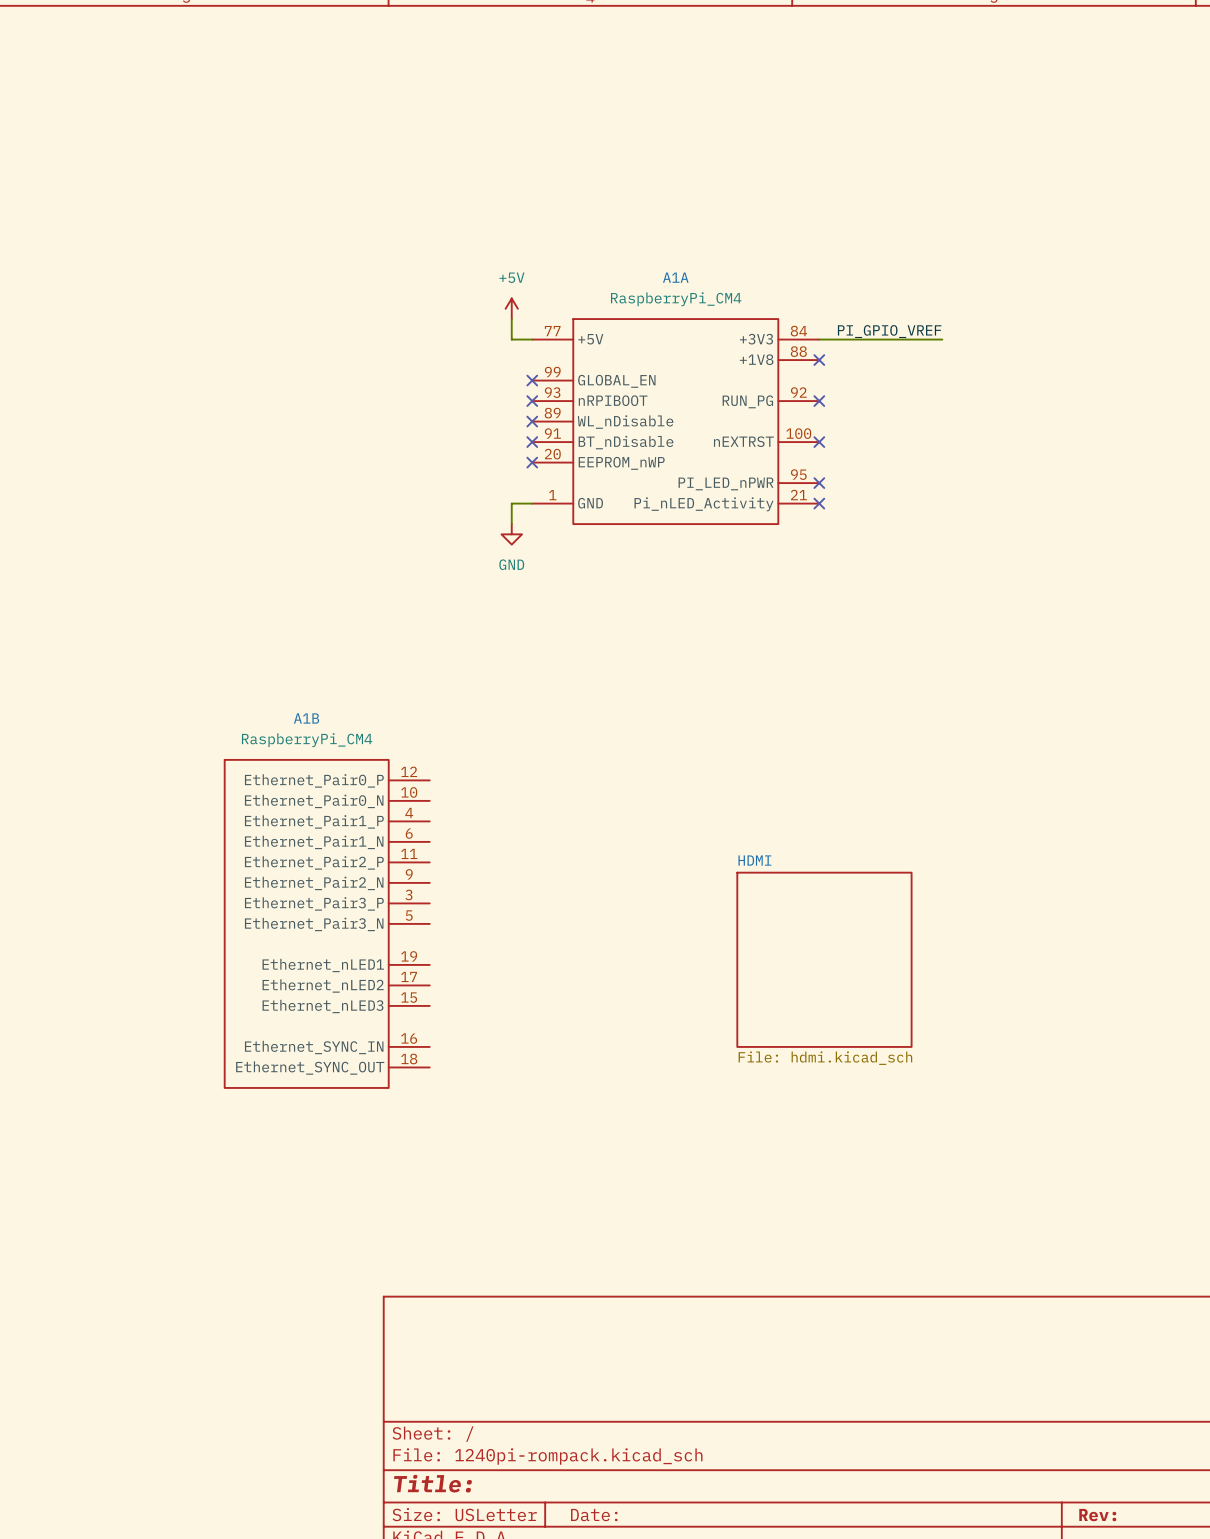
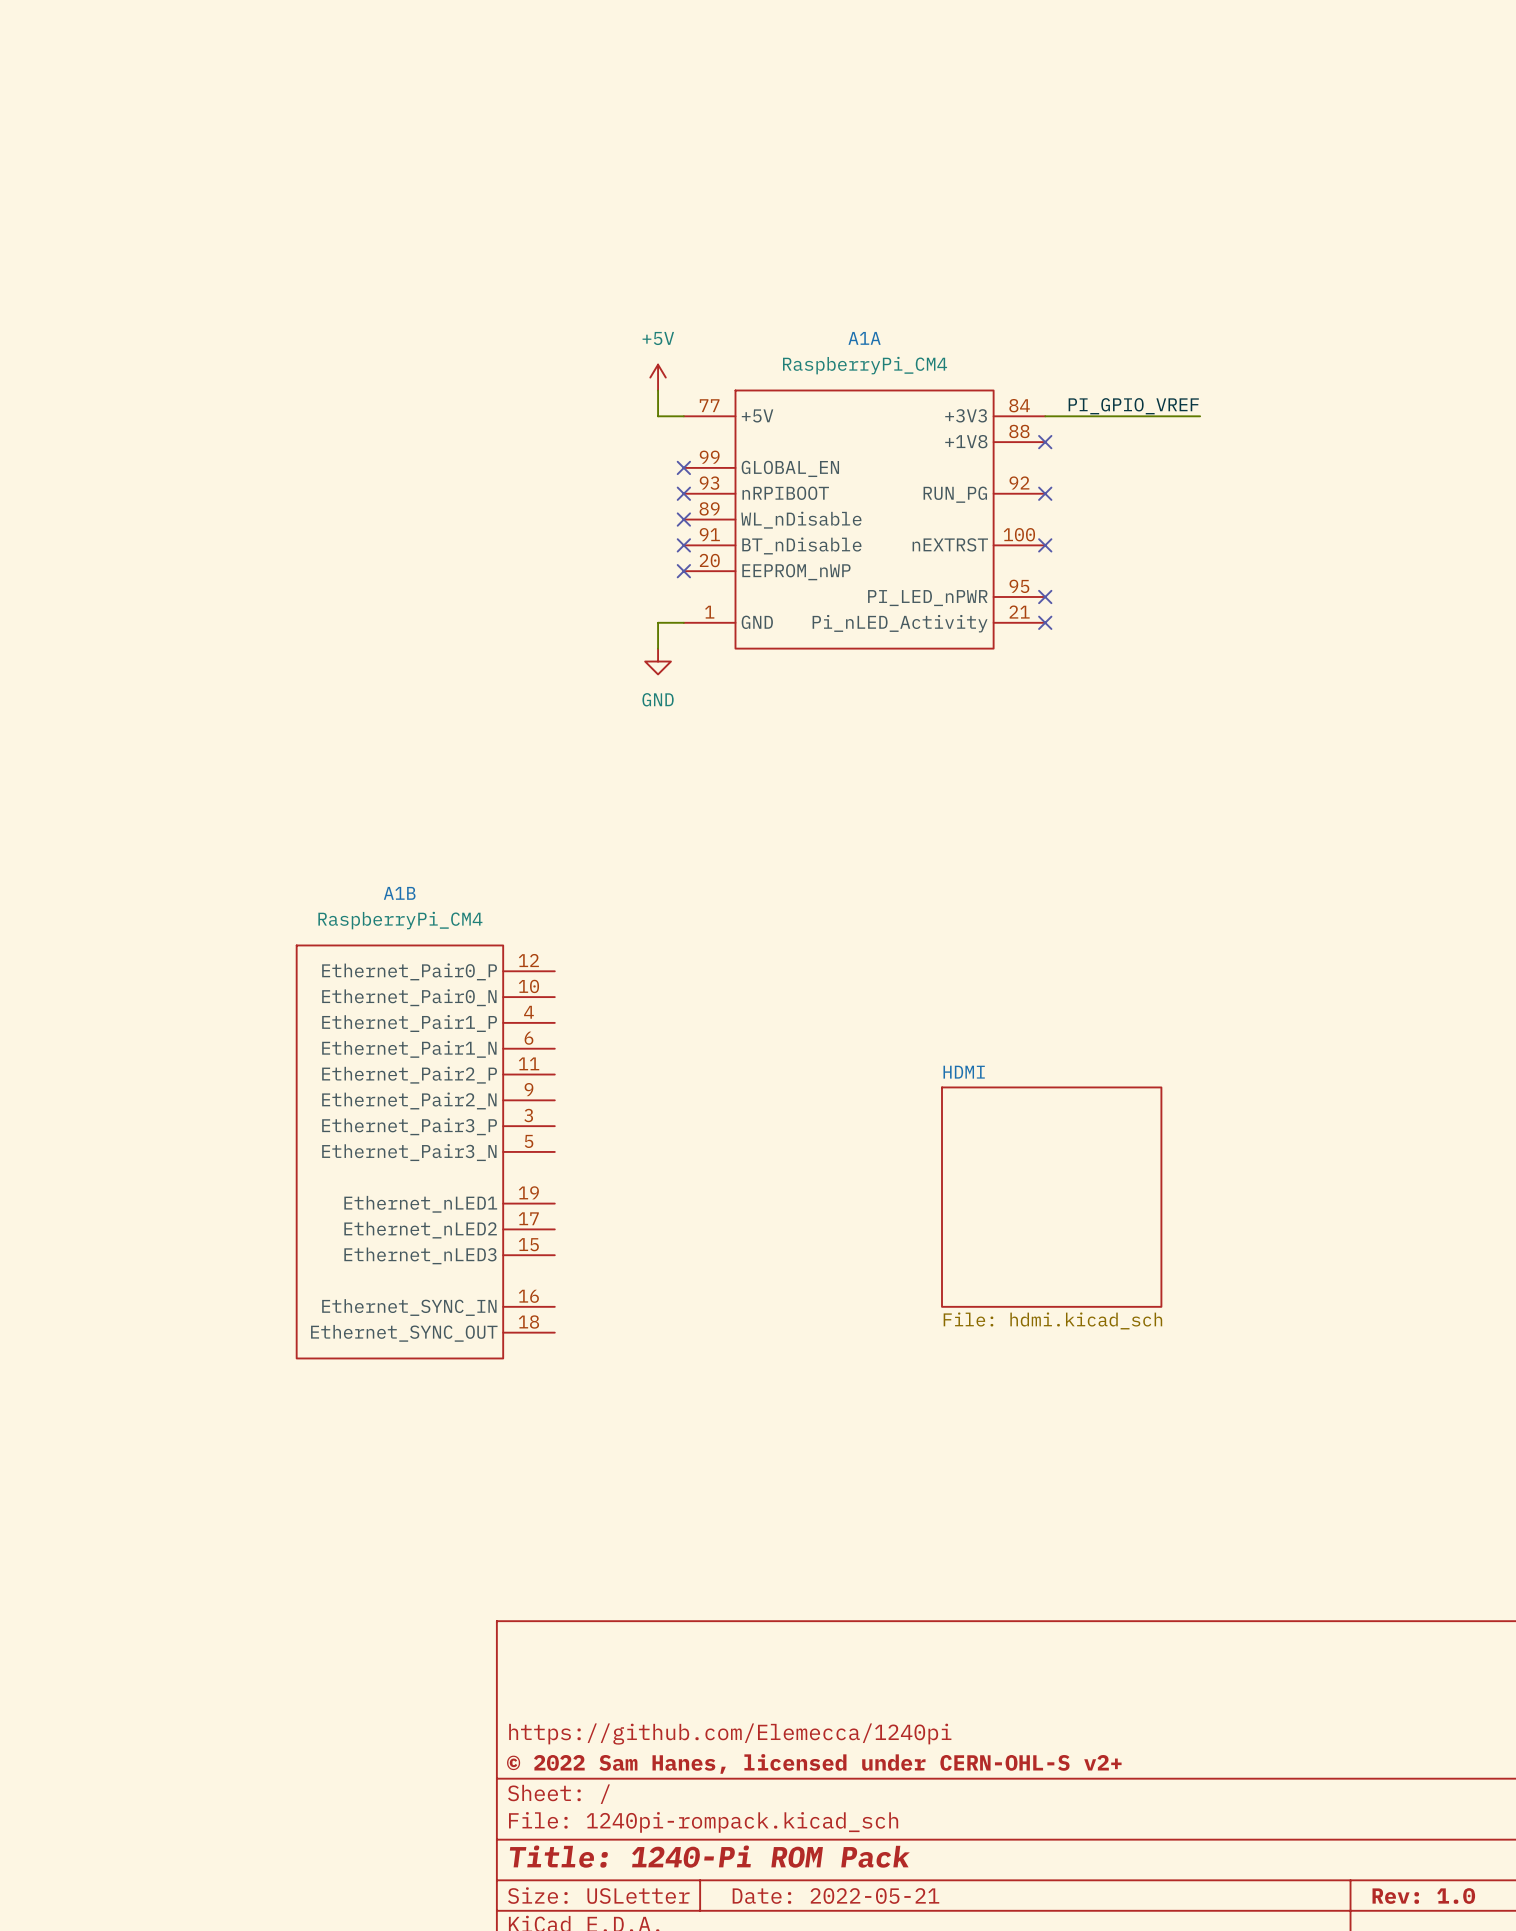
title block: none -> https://github.com/Elemecca/1240pi (730, 1734)
title block: none -> © 2022 Sam Hanes, licensed under CERN-OHL-S v2+ (814, 1763)
title block: Title: (432, 1483) -> Title: 1240-Pi ROM Pack (709, 1856)
title block: Date: (594, 1515) -> Date: 2022-05-21 (835, 1896)
title block: Rev: (1097, 1515) -> Rev: 1.0 (1423, 1896)

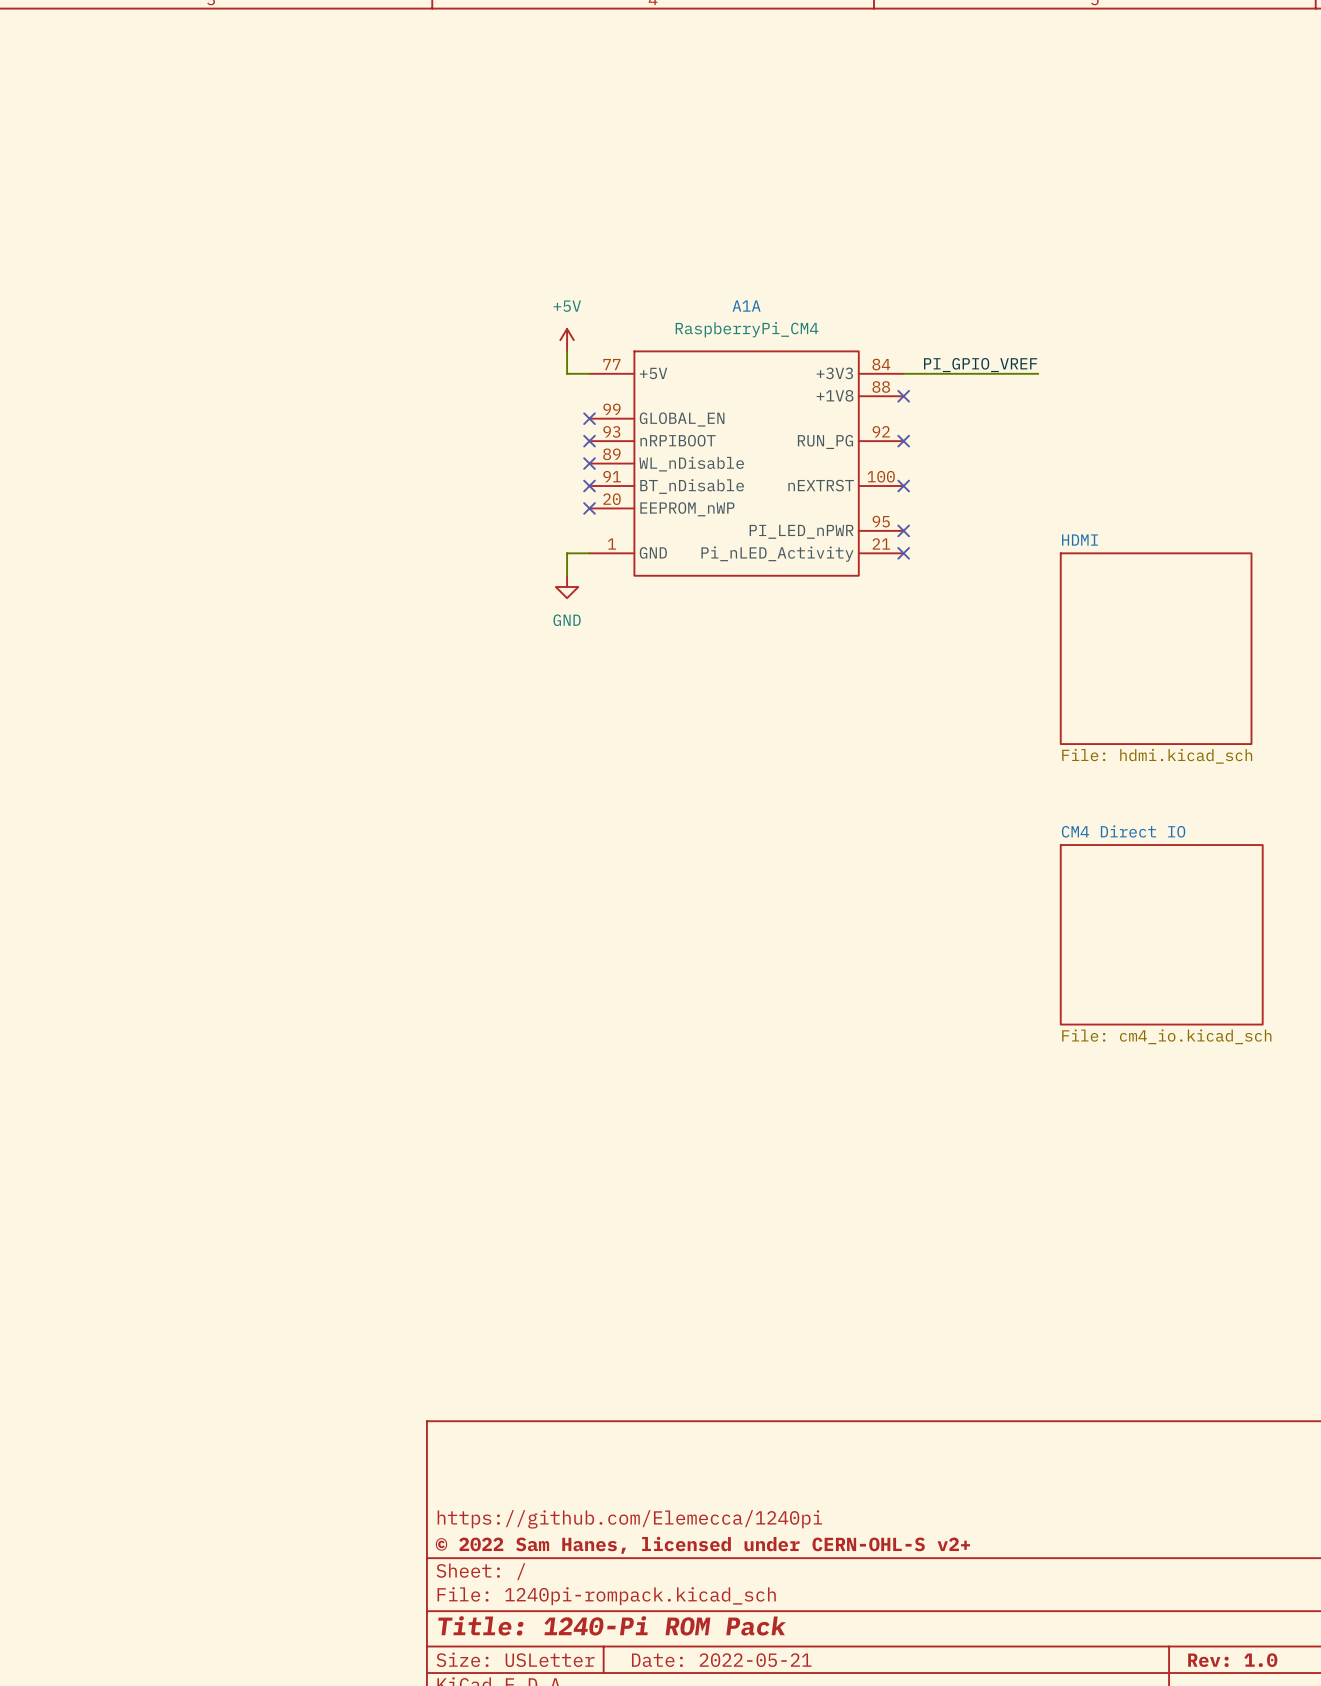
sheet HDMI: none -> File: hdmi.kicad_sch (1156, 648)
sheet CM4 Direct IO: none -> File: cm4_io.kicad_sch (1161, 934)
A1B: RaspberryPi_CM4 (425, 1151) -> none
sheet HDMI: File: hdmi.kicad_sch (1051, 1197) -> none

